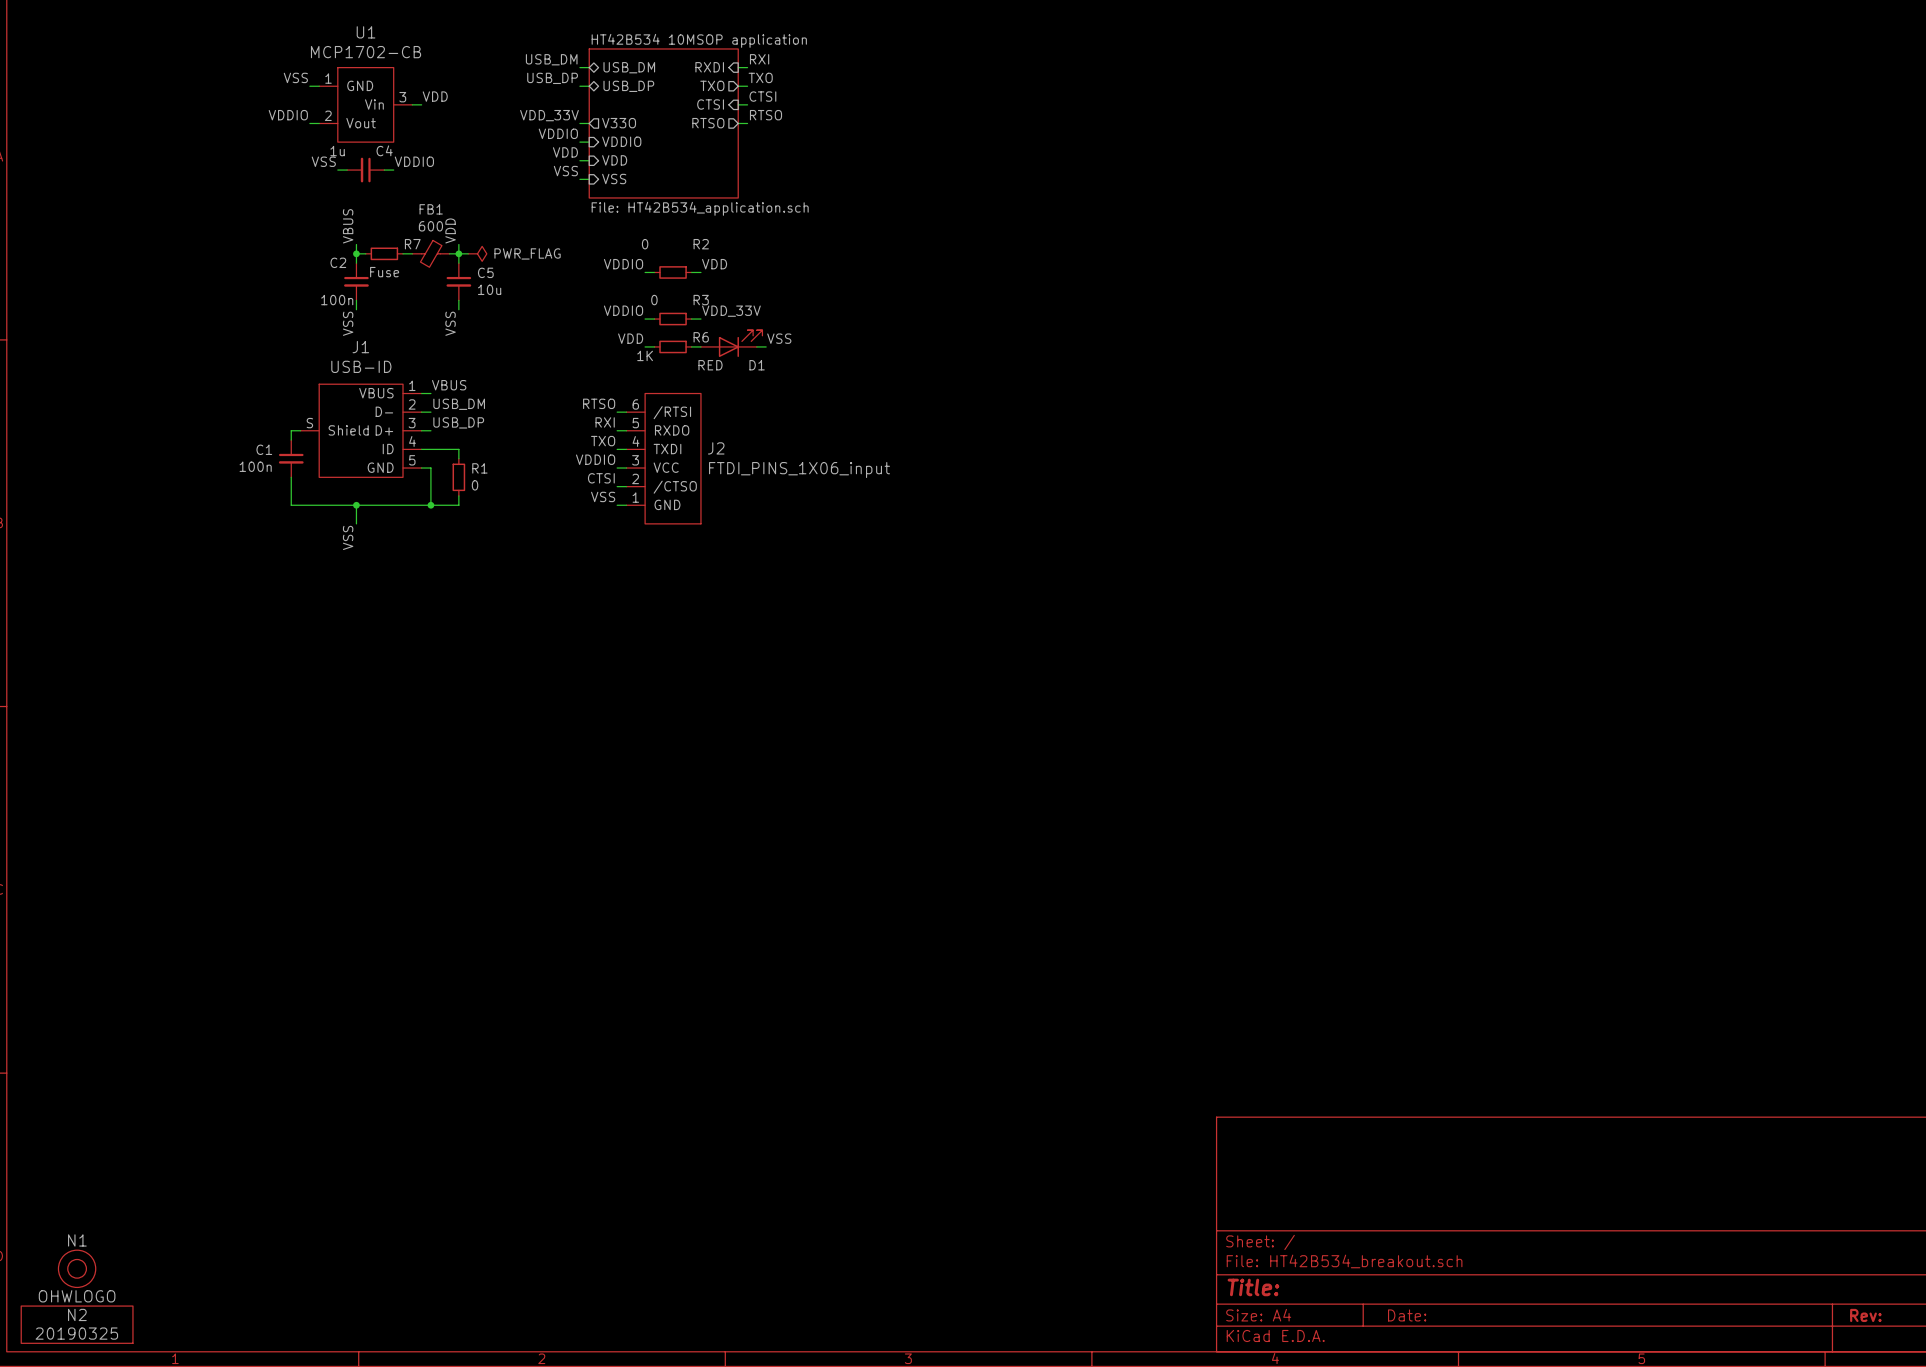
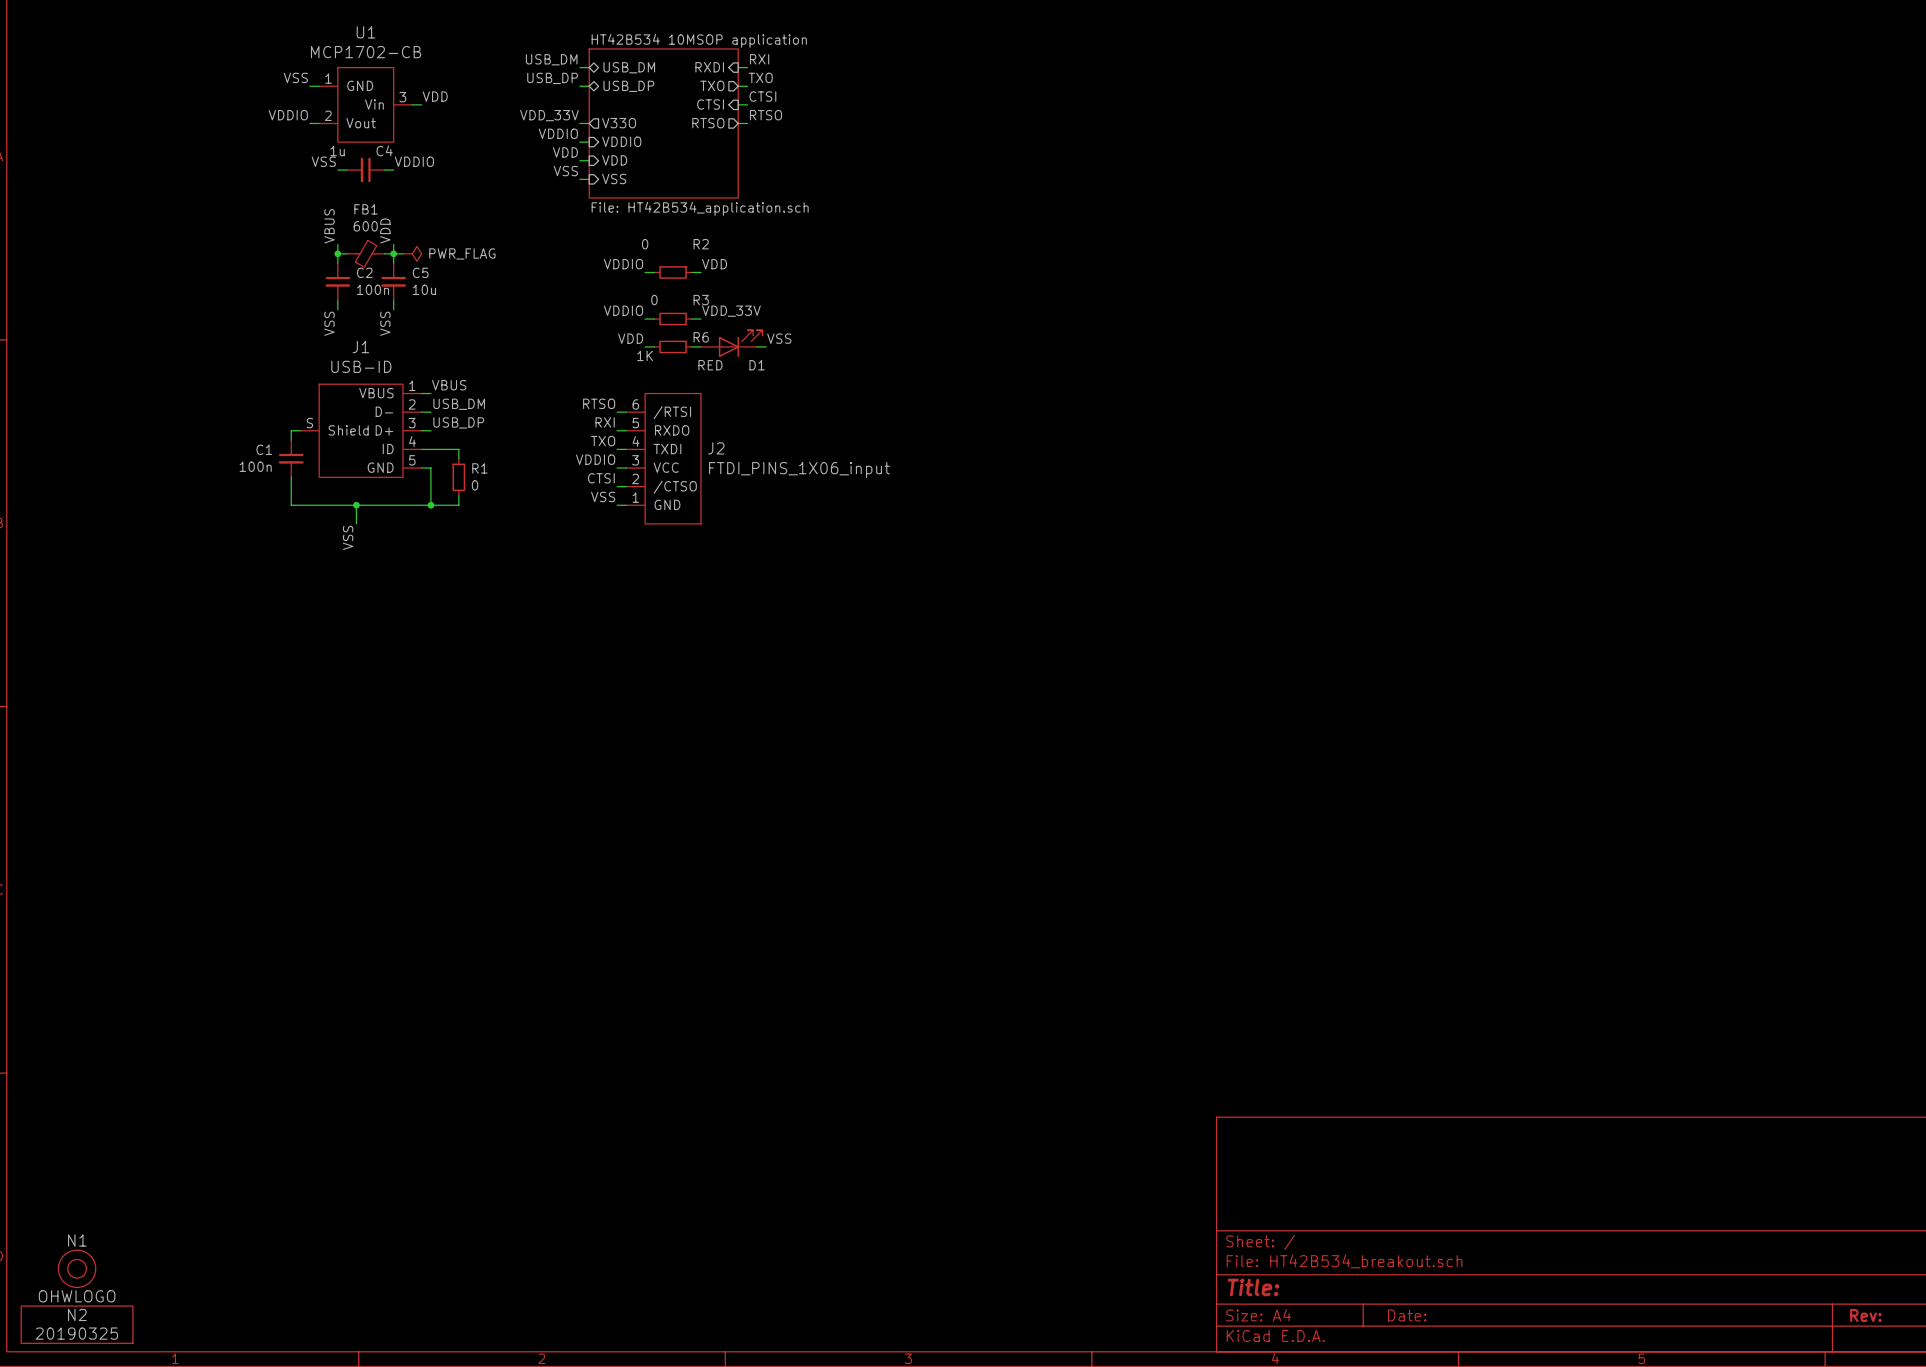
label position: VBUS (348, 226) -> VBUS (329, 226)
label position: VDD (450, 230) -> VDD (385, 230)
wire: (356, 244) (356, 263) -> (337, 244) (337, 263)
wire: (458, 244) (458, 263) -> (393, 244) (393, 263)
junction: none -> (337, 253)
wire: (356, 253) (365, 253) -> (337, 253) (347, 253)
junction: (356, 253) -> none
R7: Fuse (384, 253) -> none
junction: none -> (393, 253)
FB1 position: (430, 253) -> (365, 253)
wire: (449, 253) (468, 253) -> none
junction: (458, 253) -> none
power symbol position: PWR_FLAG (477, 253) -> PWR_FLAG (412, 253)
C2 name position: C2 (338, 262) -> C2 (364, 272)
C2 position: (356, 281) -> (337, 281)
C5 position: (458, 281) -> (393, 281)
C2 value position: 100n (337, 300) -> 100n (372, 289)
wire: (356, 300) (356, 309) -> (337, 300) (337, 309)
wire: (458, 300) (458, 309) -> (393, 300) (393, 309)
label position: VSS (348, 323) -> VSS (329, 323)
label: none -> VSS (385, 323)
label: VSS (450, 323) -> none

